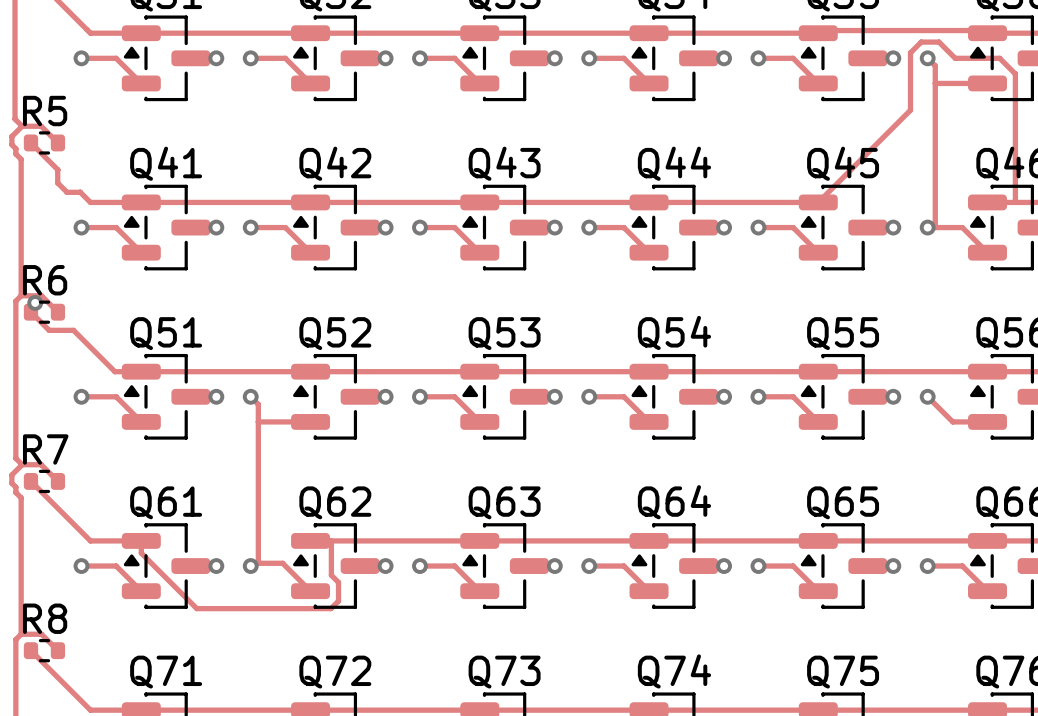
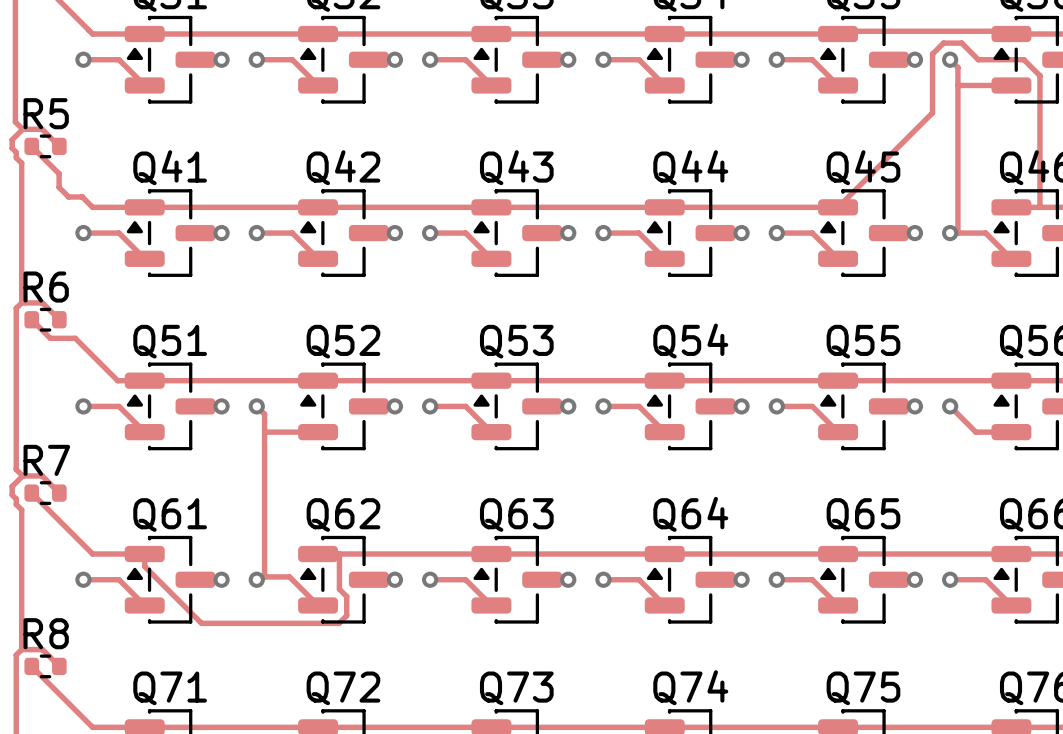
via: (35, 302) -> none

